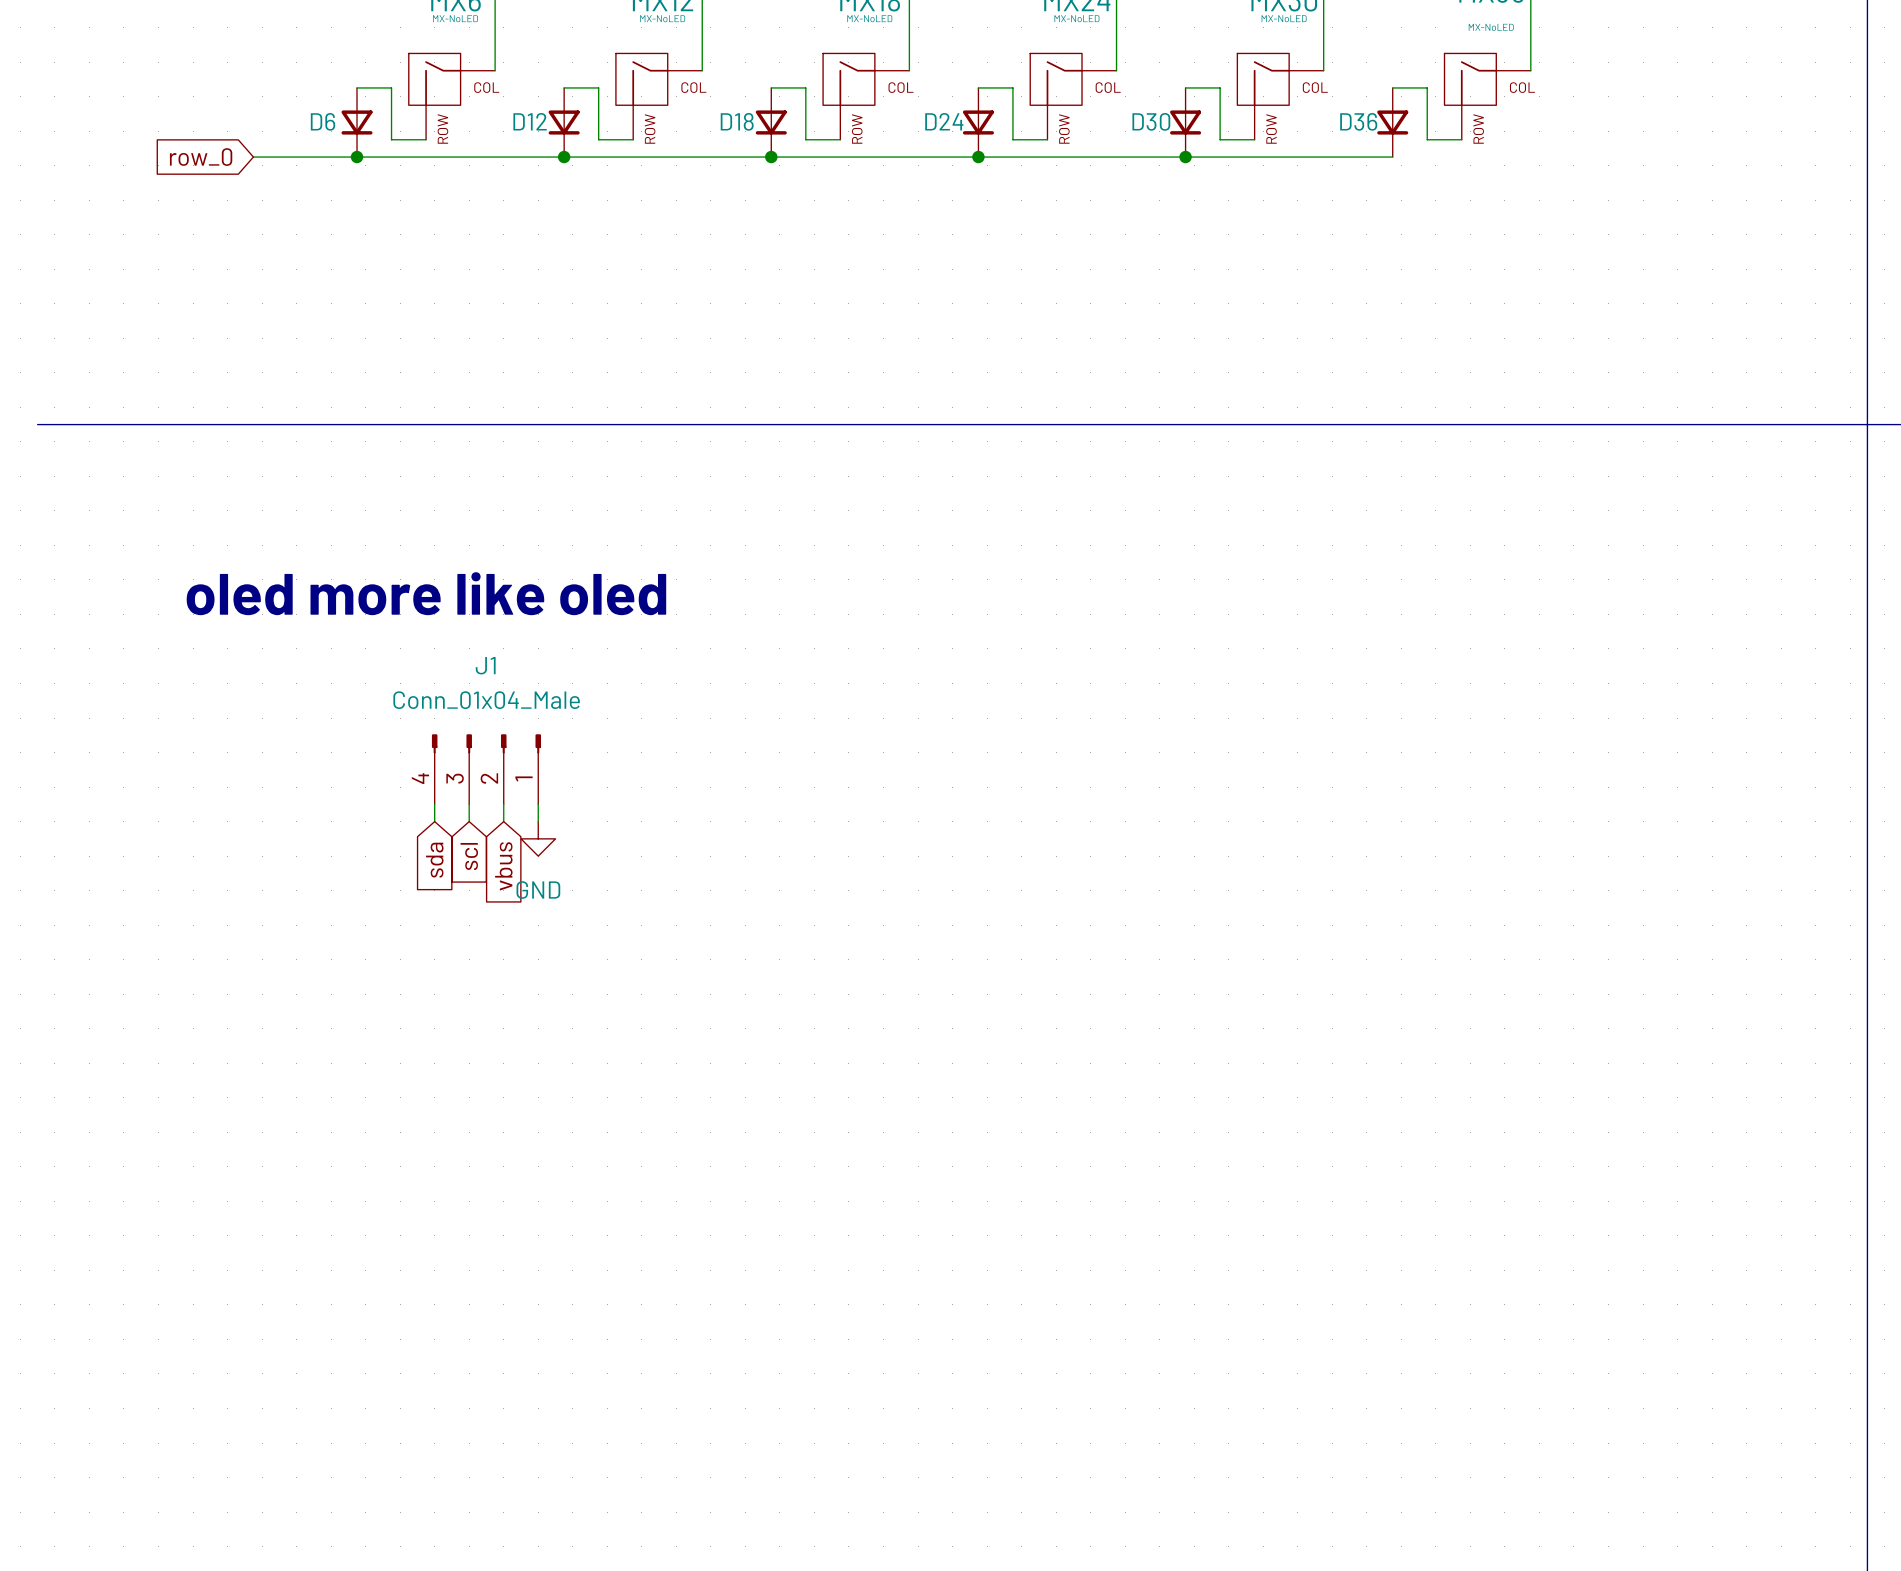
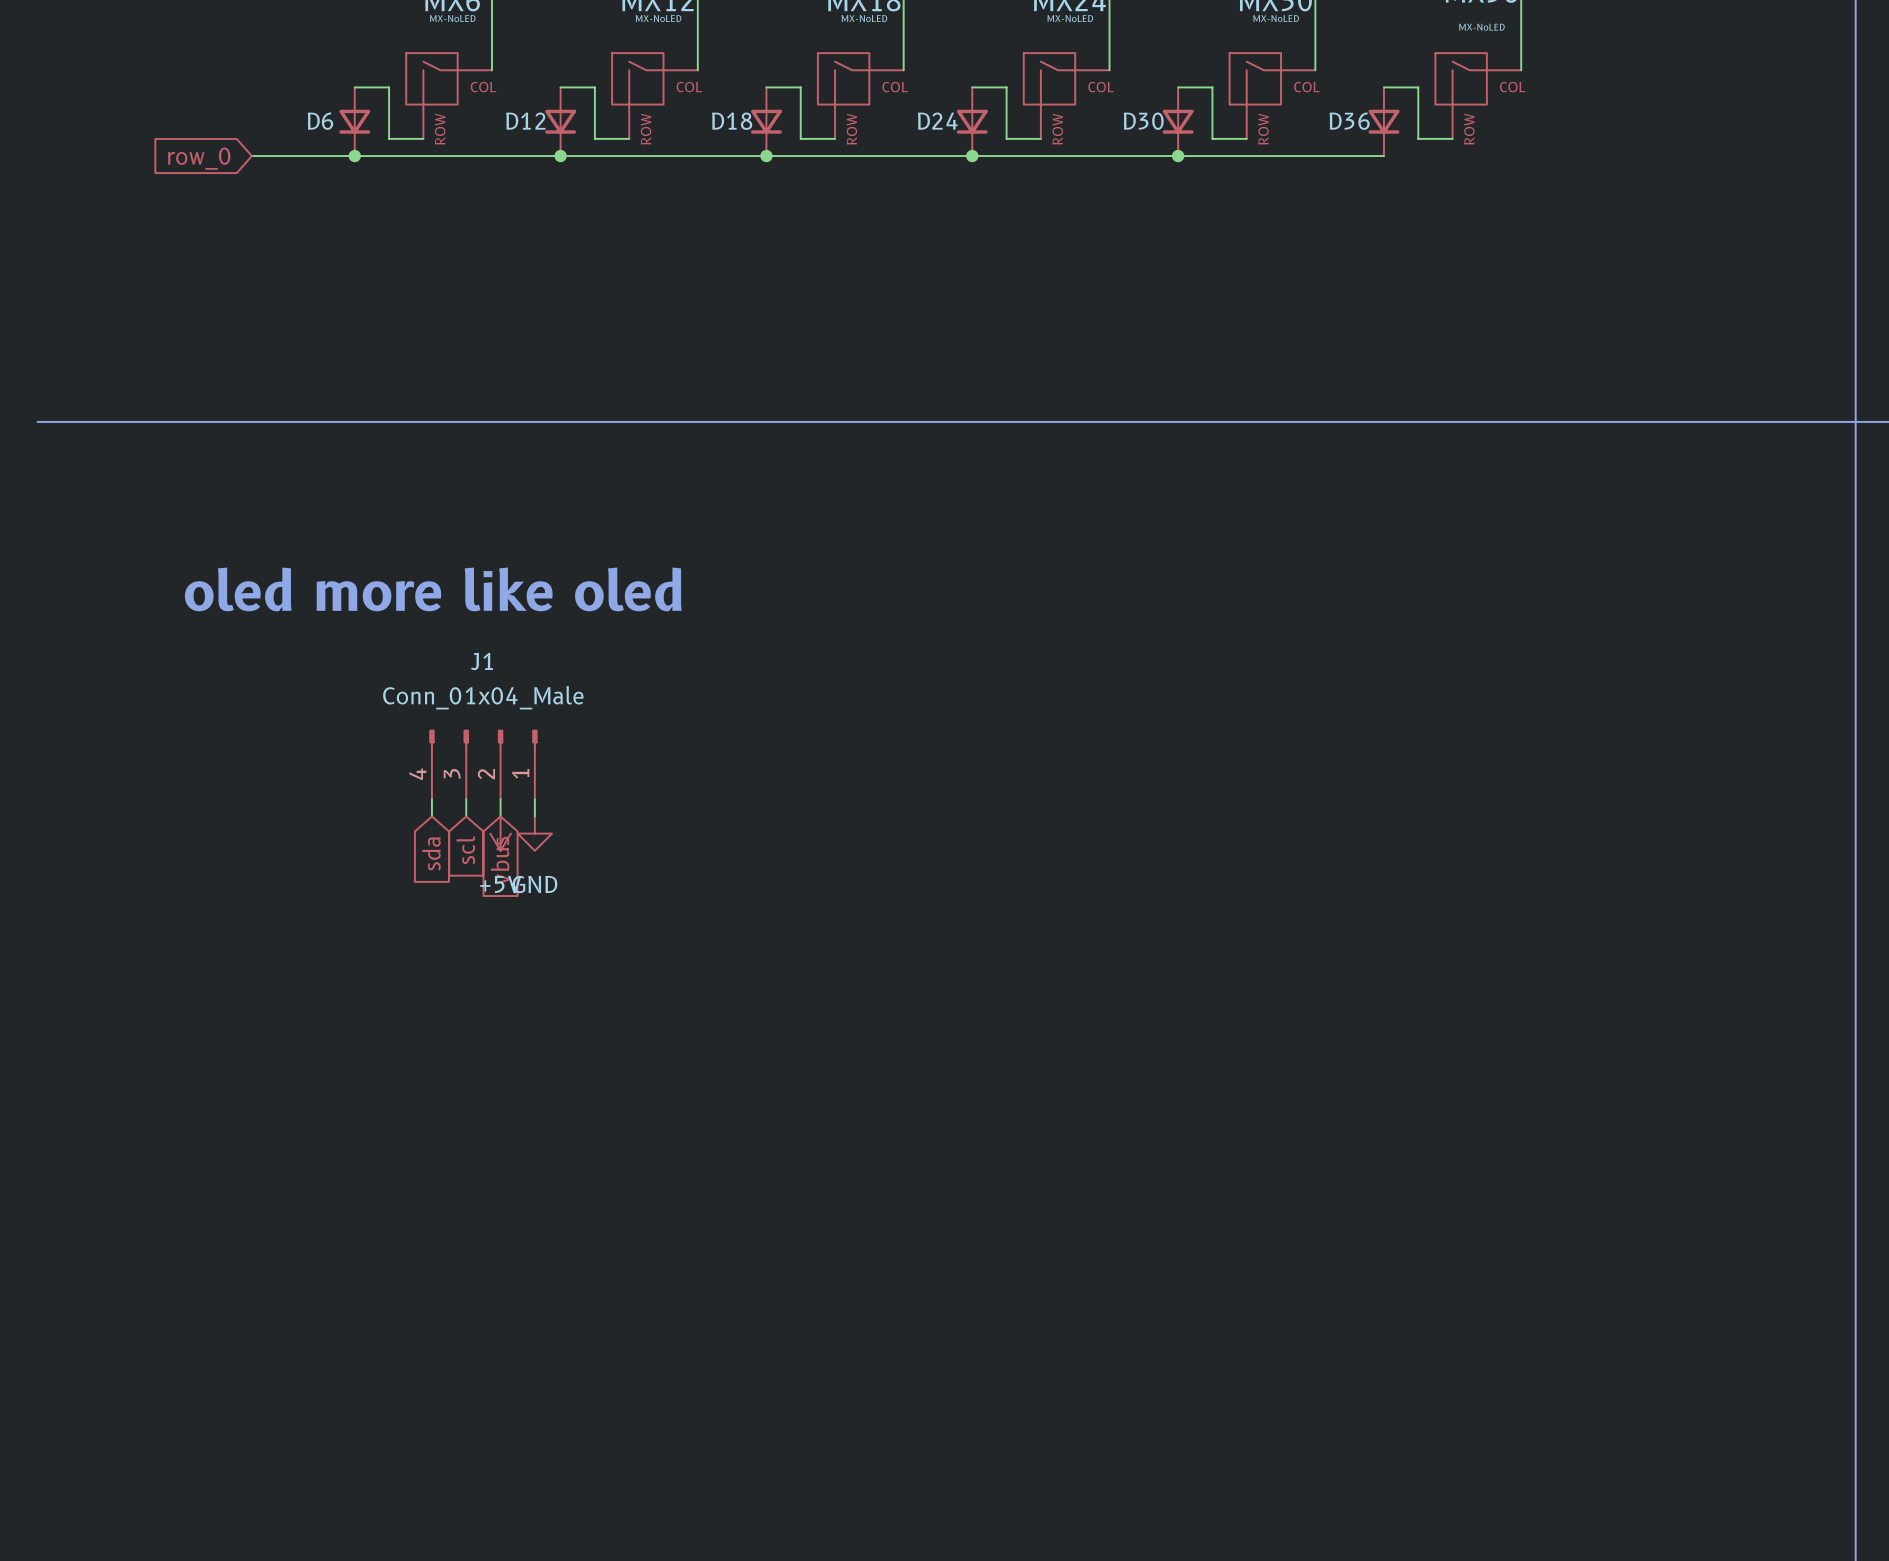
power symbol: none -> +5V (500, 833)

